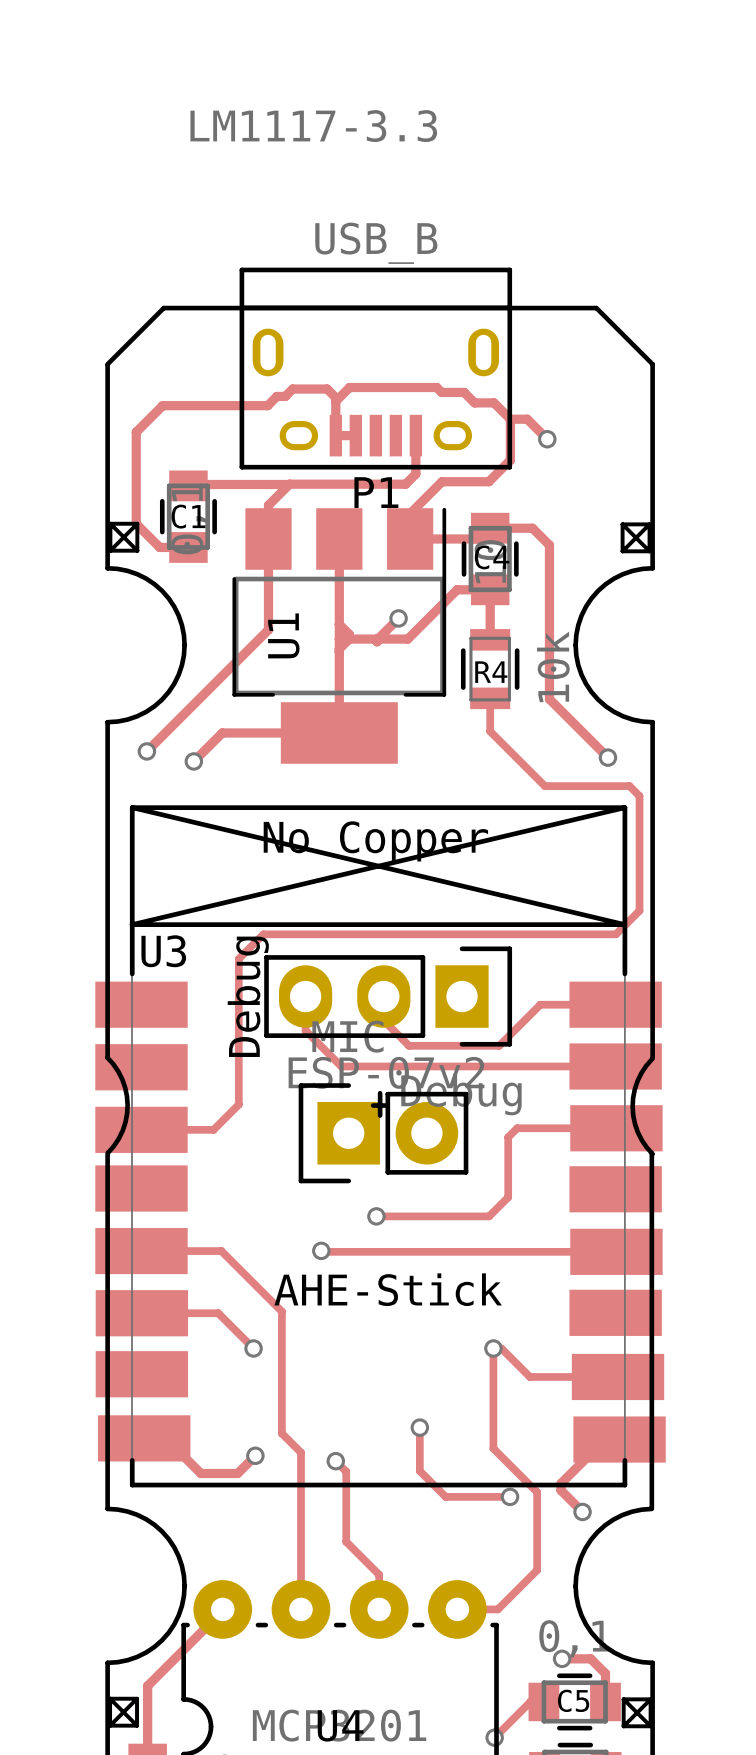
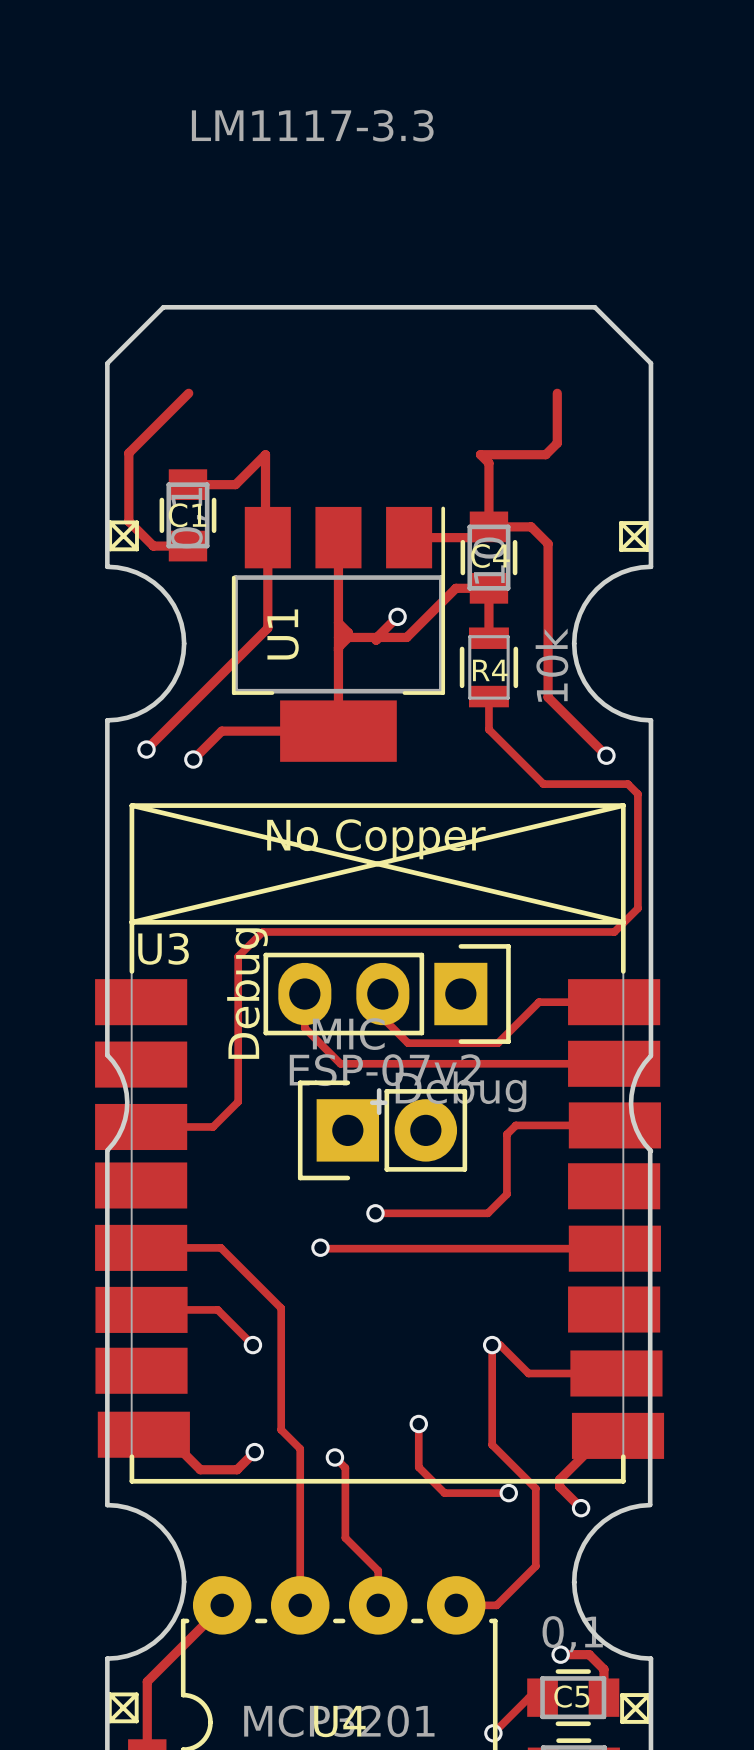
P1: USB_B (375, 368) -> none
track: none -> (557, 393) (557, 443) (545, 454) (480, 454) (488, 463) (488, 526)
track: (335, 401) (349, 387) (436, 387) (441, 392) (464, 392) (474, 402) (494, 402) (510, 419) -> none
track: (510, 419) (527, 419) (547, 439) -> none
track: (510, 419) (510, 460) (488, 481) (442, 481) (410, 513) (410, 539) -> none
track: (355, 435) (335, 435) (335, 397) (327, 389) (292, 389) (285, 396) (276, 396) (267, 405) (162, 405) (136, 432) (136, 523) (159, 547) -> (188, 393) (128, 453) (128, 521) (153, 546) (159, 546)
track: (415, 435) (415, 474) (405, 484) (289, 484) (268, 505) (268, 539) -> none
via: (547, 439) -> none
track: (289, 484) (188, 485) -> (265, 535) (265, 454) (235, 484) (187, 484)
text: AHE-Stick (388, 1289) -> none

